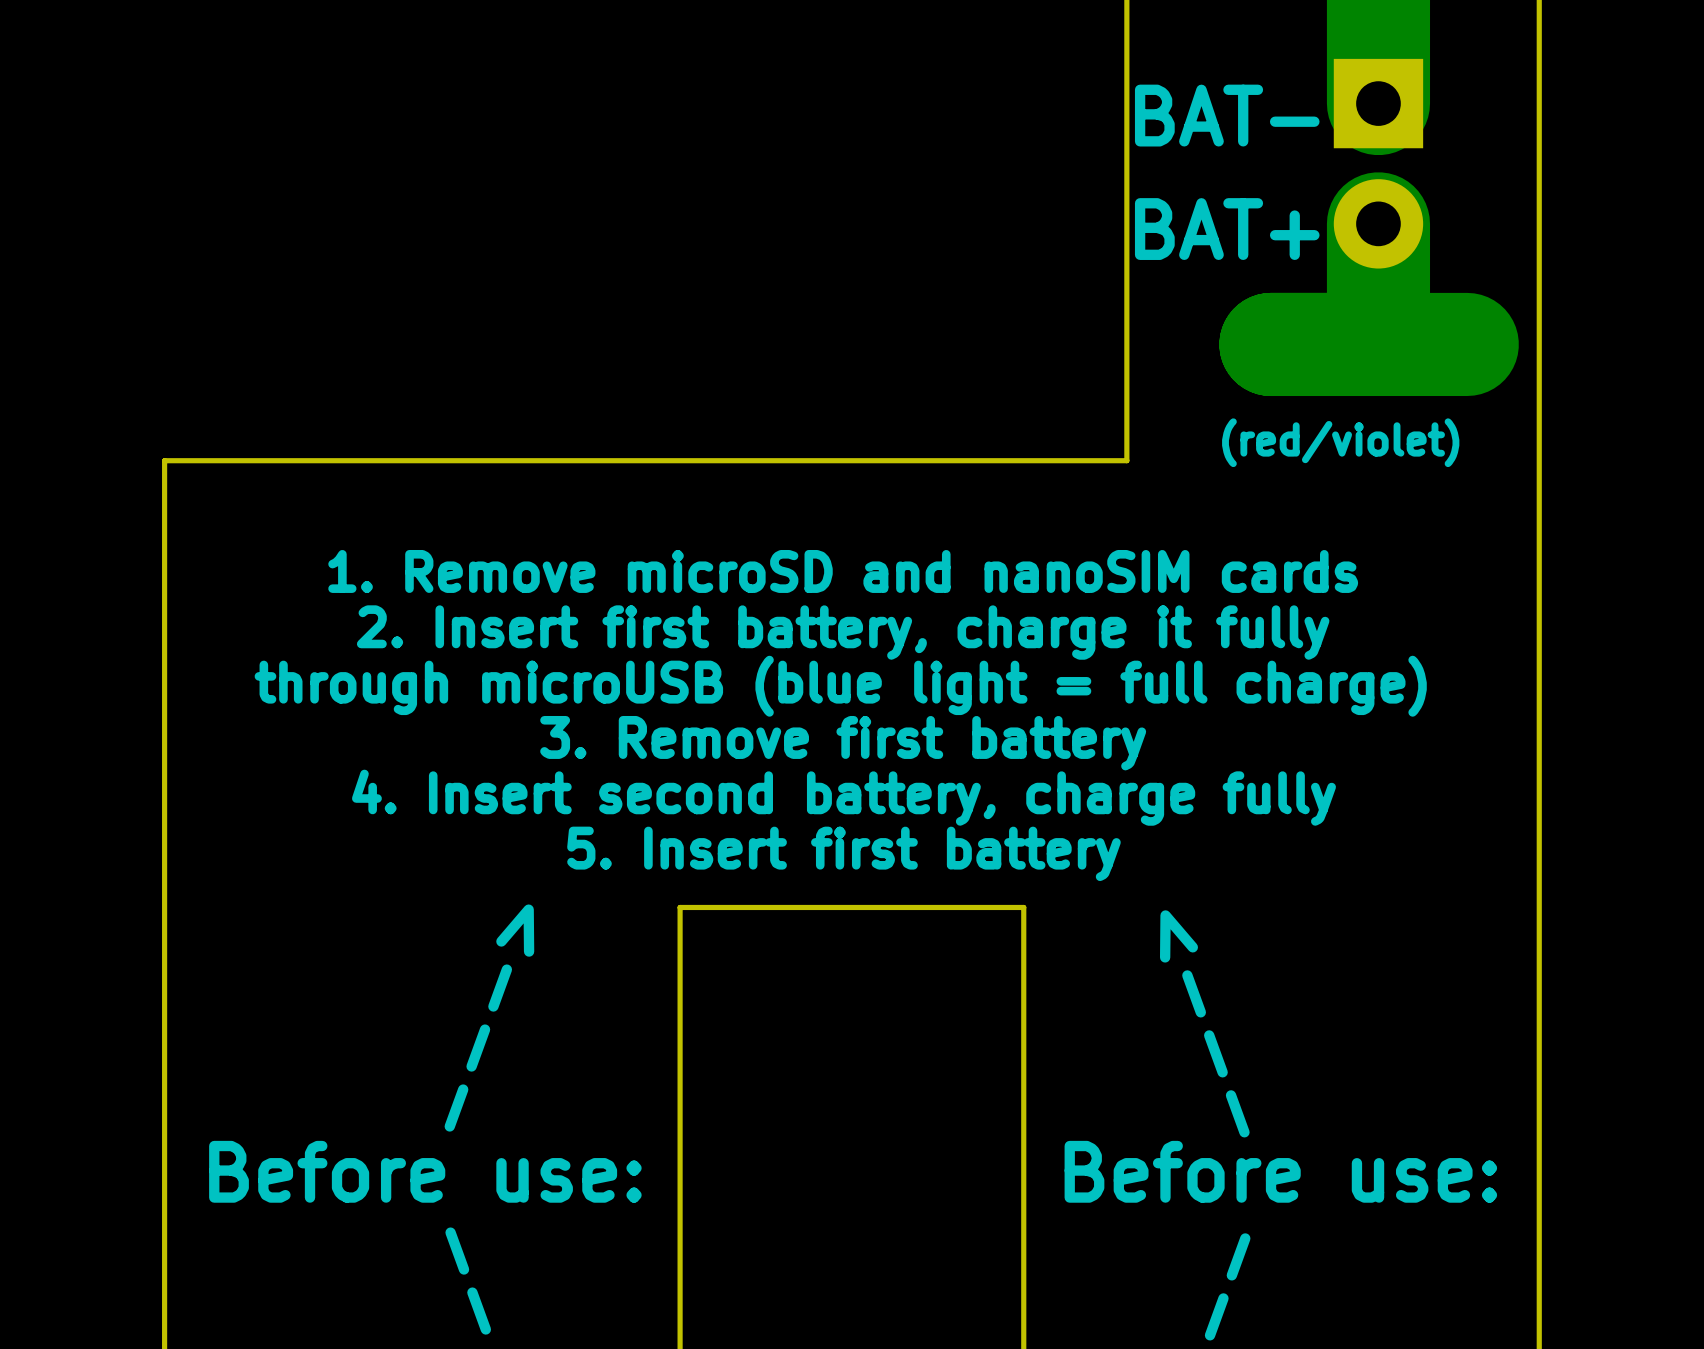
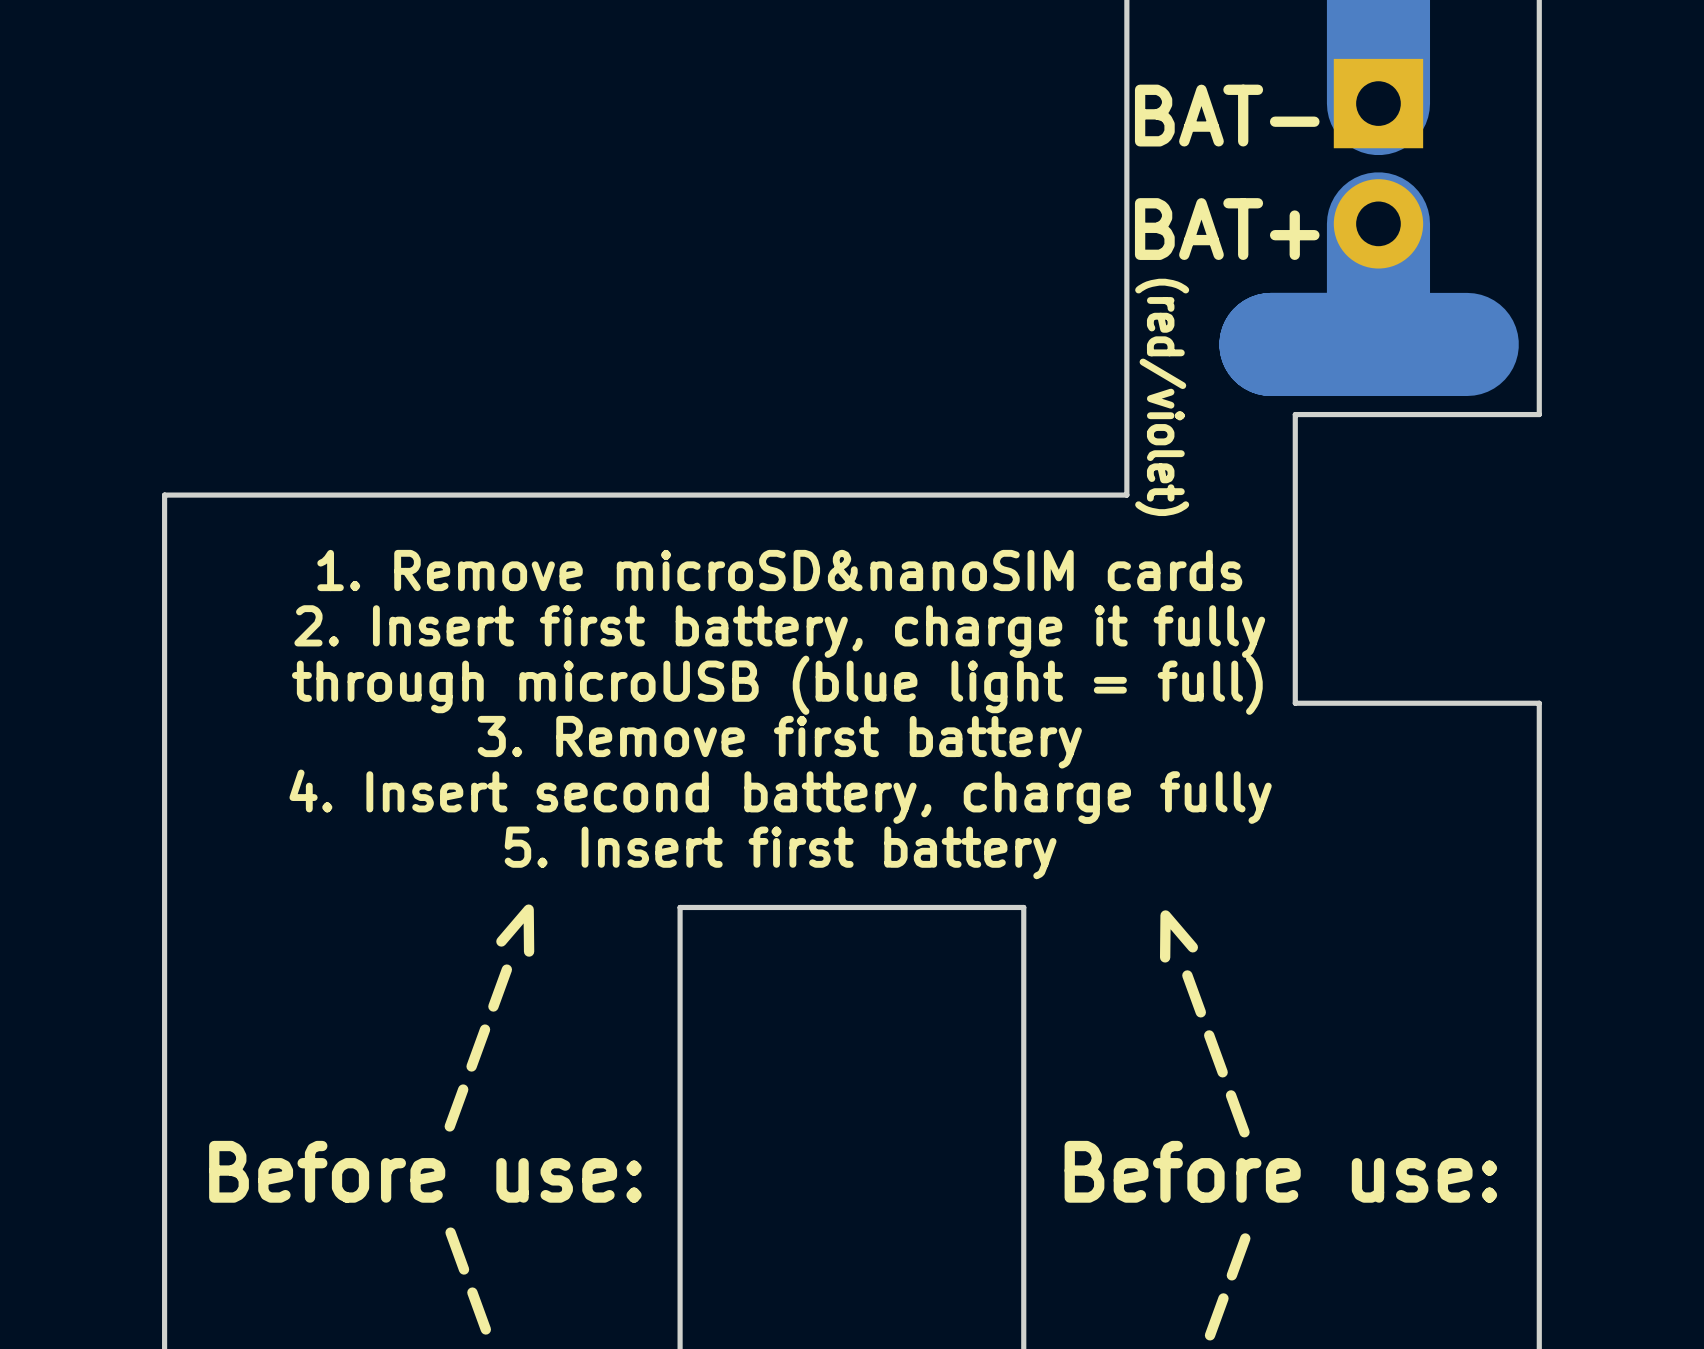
board edge: (1539, 414) (1539, 703) -> (1539, 414) (1295, 414) (1295, 703) (1539, 703)
text rotation: 0° (1340, 442) -> 90° clockwise (1162, 397)
board edge: (1126, 460) (164, 460) (164, 495) -> (1126, 460) (1126, 495) (164, 495)
text: 1. Remove microSD and nanoSIM cards (843, 571) -> 1. Remove microSD&nanoSIM cards (779, 570)
text position: 2. Insert first battery, charge it fully (843, 632) -> 2. Insert first battery, charge it fully (779, 631)
text: through microUSB (blue light = full charge) (840, 686) -> through microUSB (blue light = full) (777, 685)
text position: 3. Remove first battery (843, 743) -> 3. Remove first battery (779, 742)
text position: 4. Insert second battery, charge fully (843, 797) -> 4. Insert second battery, charge fully (780, 796)
text position: 5. Insert first battery (843, 853) -> 5. Insert first battery (780, 852)

